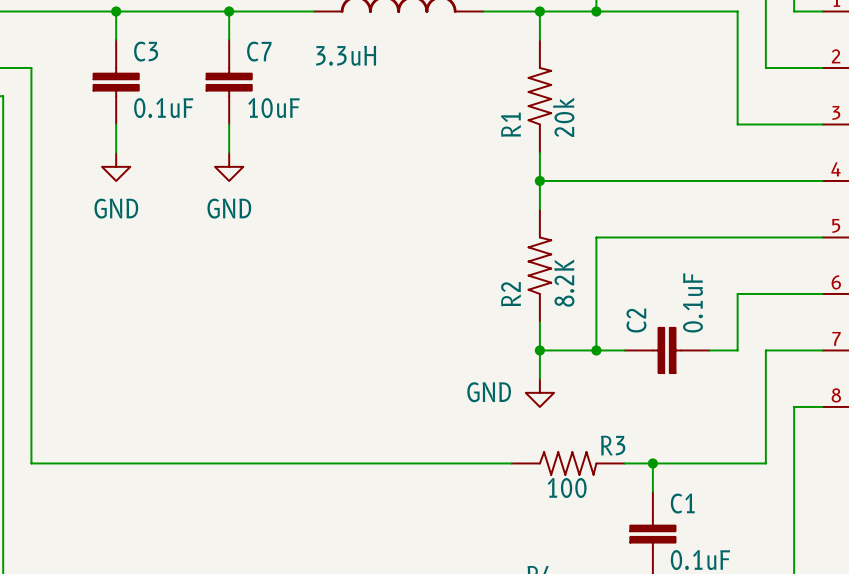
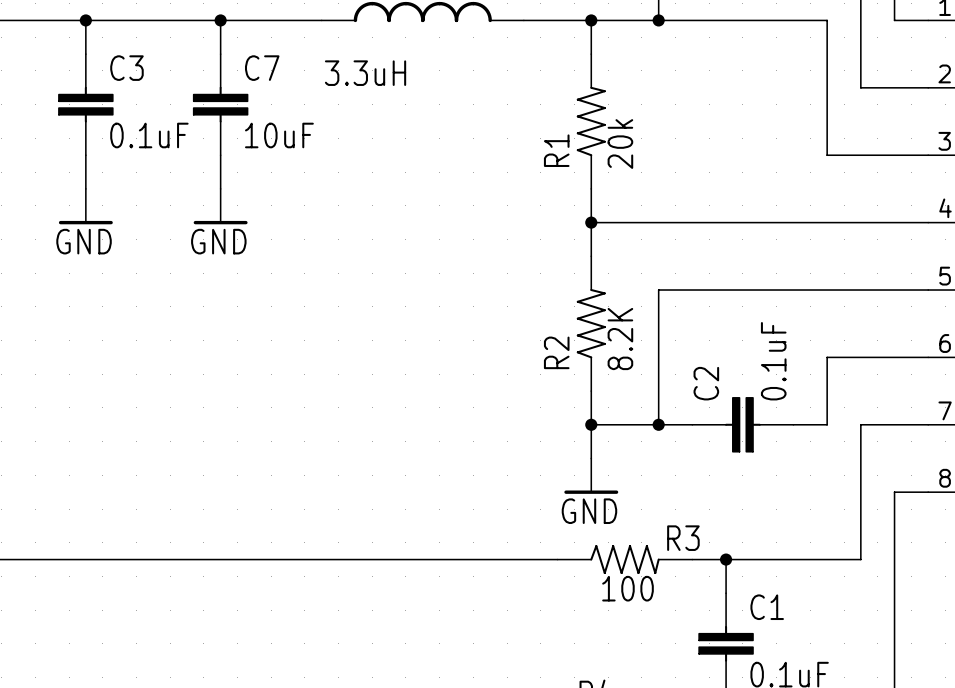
power symbol shape: [102, 152, 131, 181] -> [58, 188, 113, 225]
power symbol shape: [215, 152, 244, 181] -> [193, 188, 248, 225]
power symbol shape: [525, 378, 555, 407] -> [564, 458, 619, 494]
power symbol text position: GND (489, 392) -> GND (589, 511)

